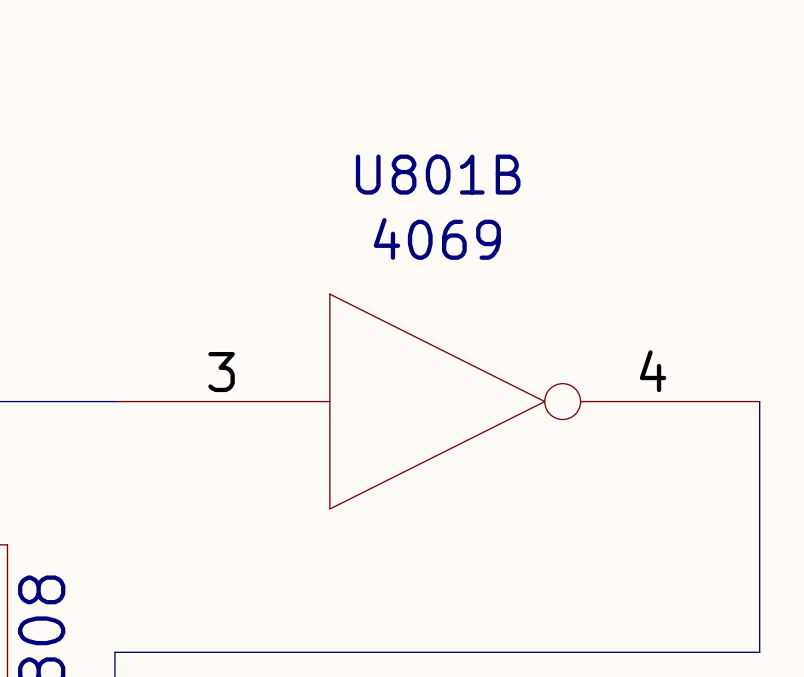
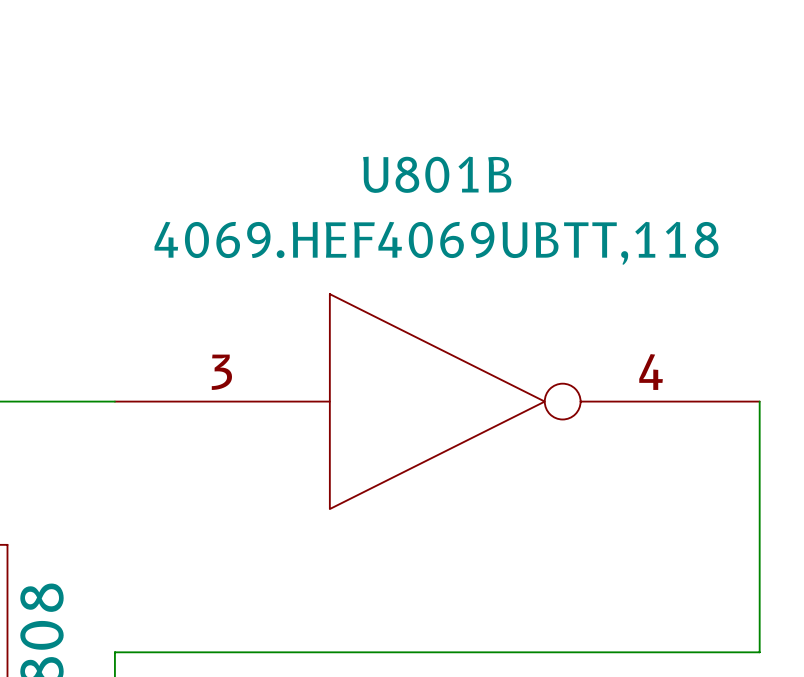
U801B value: 4069 (437, 238) -> 4069.HEF4069UBTT,118 (436, 243)

